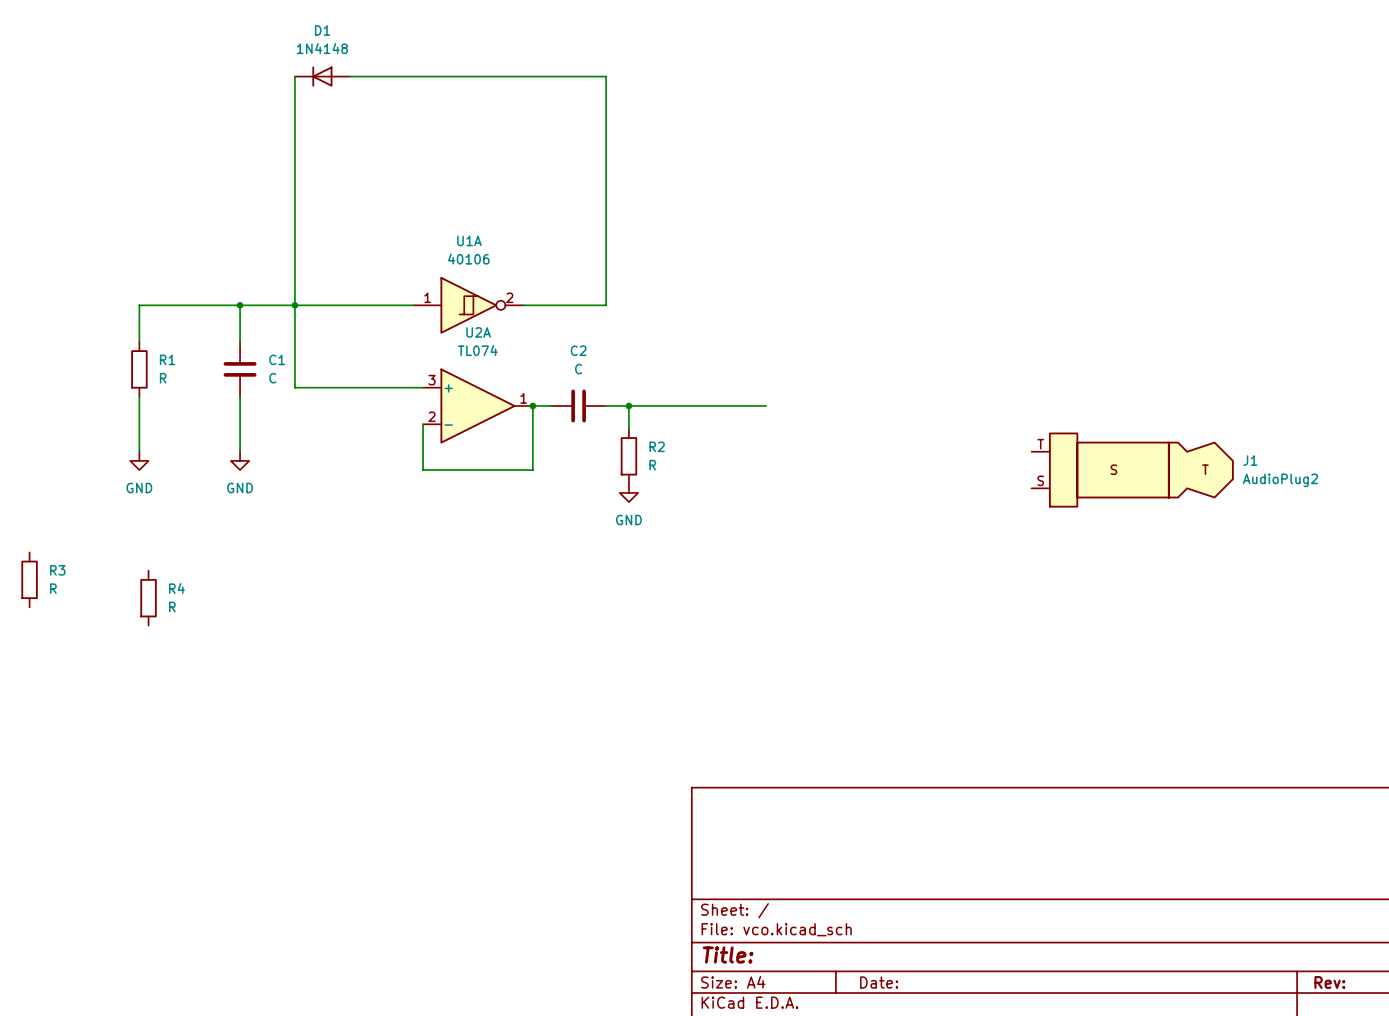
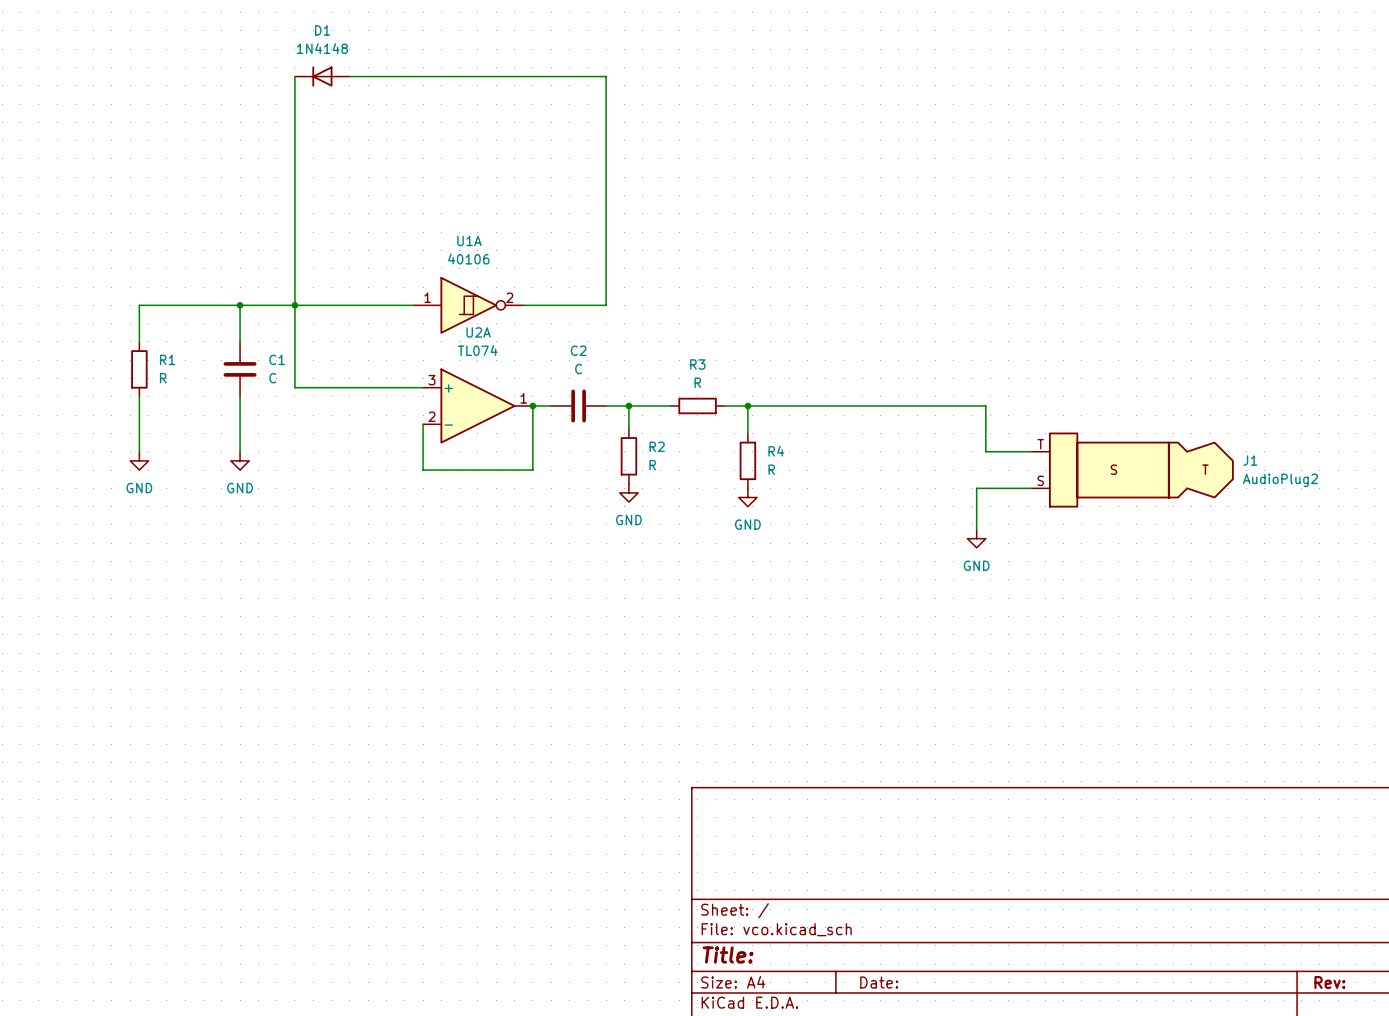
wire: (670, 405) (725, 405) -> none
wire: none -> (747, 405) (747, 433)
junction: none -> (747, 405)
wire: none -> (766, 405) (985, 405) (985, 451) (1031, 451)
wire: none -> (1031, 488) (976, 488) (976, 529)
power symbol: none -> GND (747, 497)
power symbol: none -> GND (976, 538)
R3 name position: R3 (57, 570) -> R3 (697, 364)
R3 rotation: 0° (29, 579) -> 90° clockwise (697, 405)
R3 position: (29, 579) -> (697, 405)
R3 value position: R (53, 588) -> R (697, 382)
R4 position: (148, 598) -> (747, 460)

